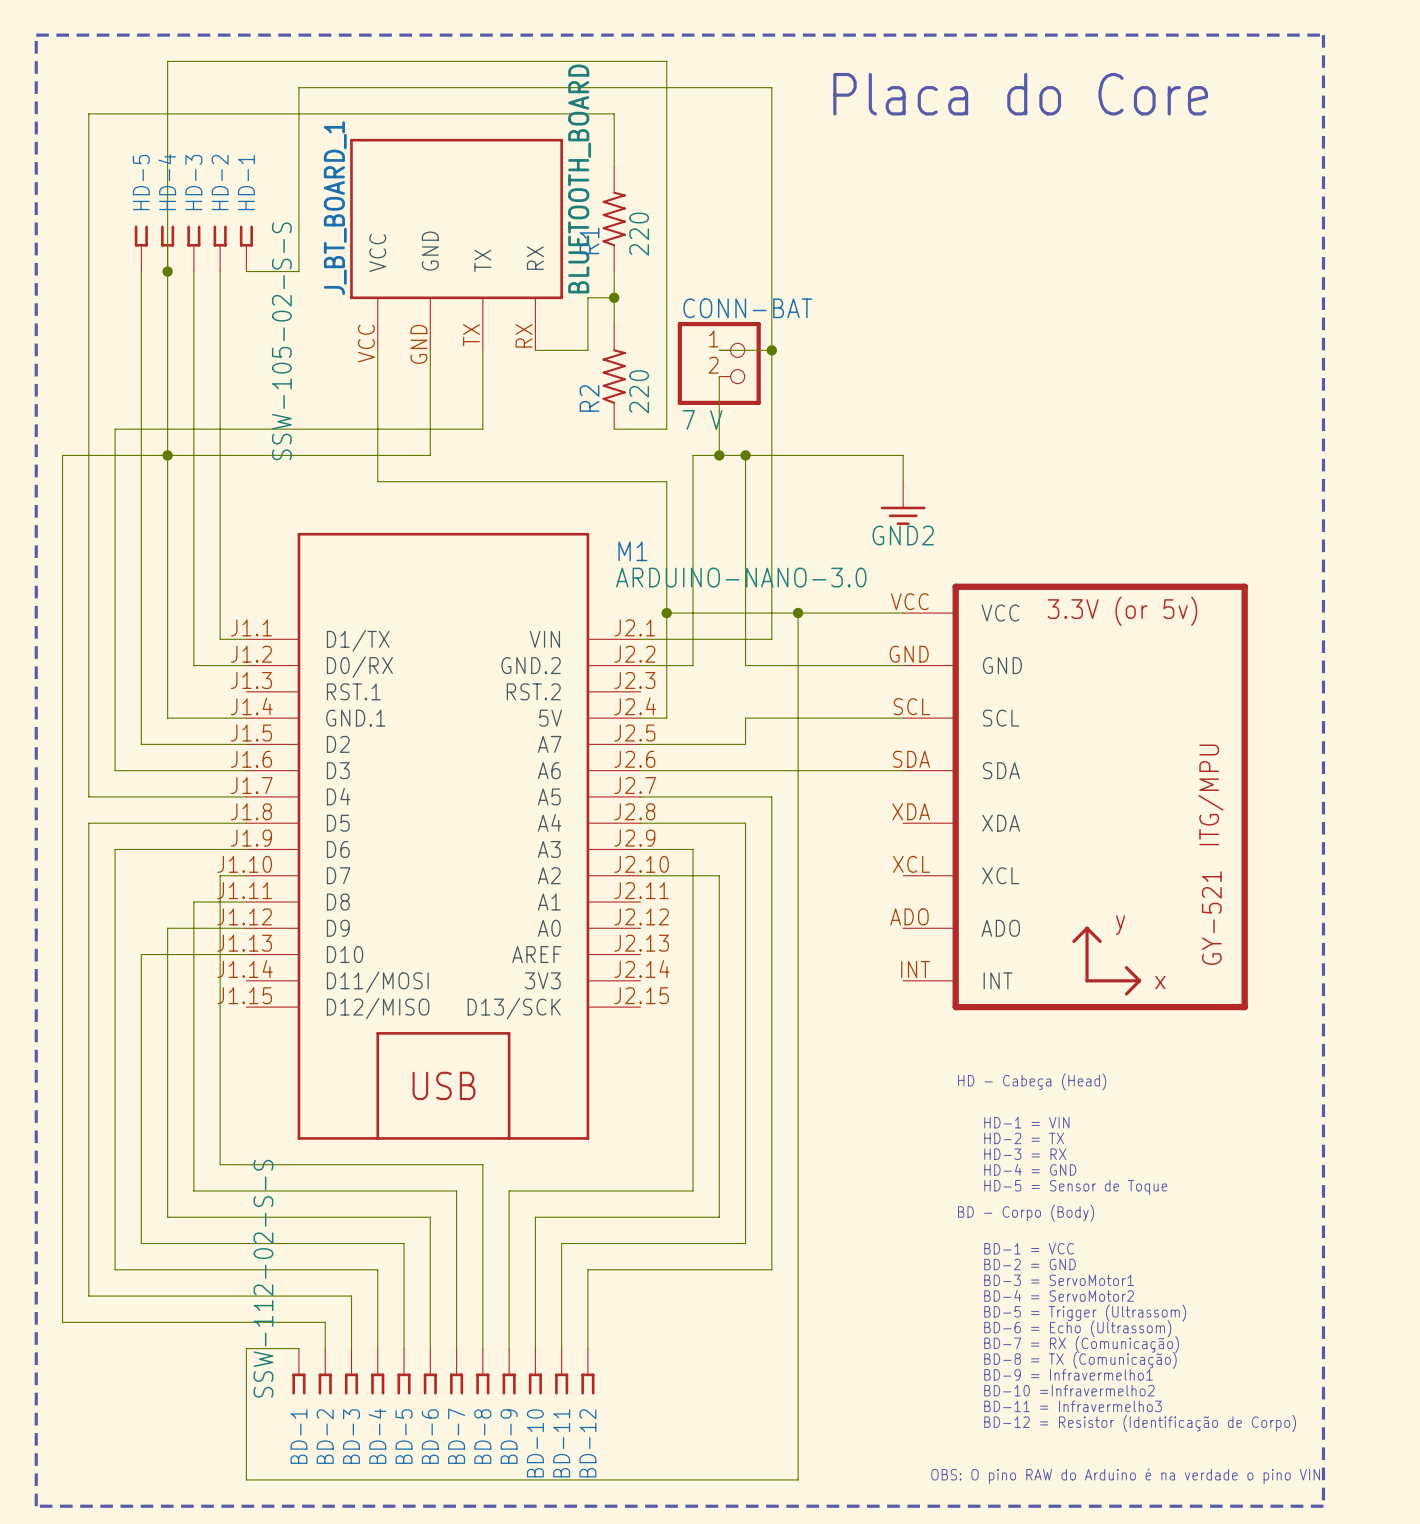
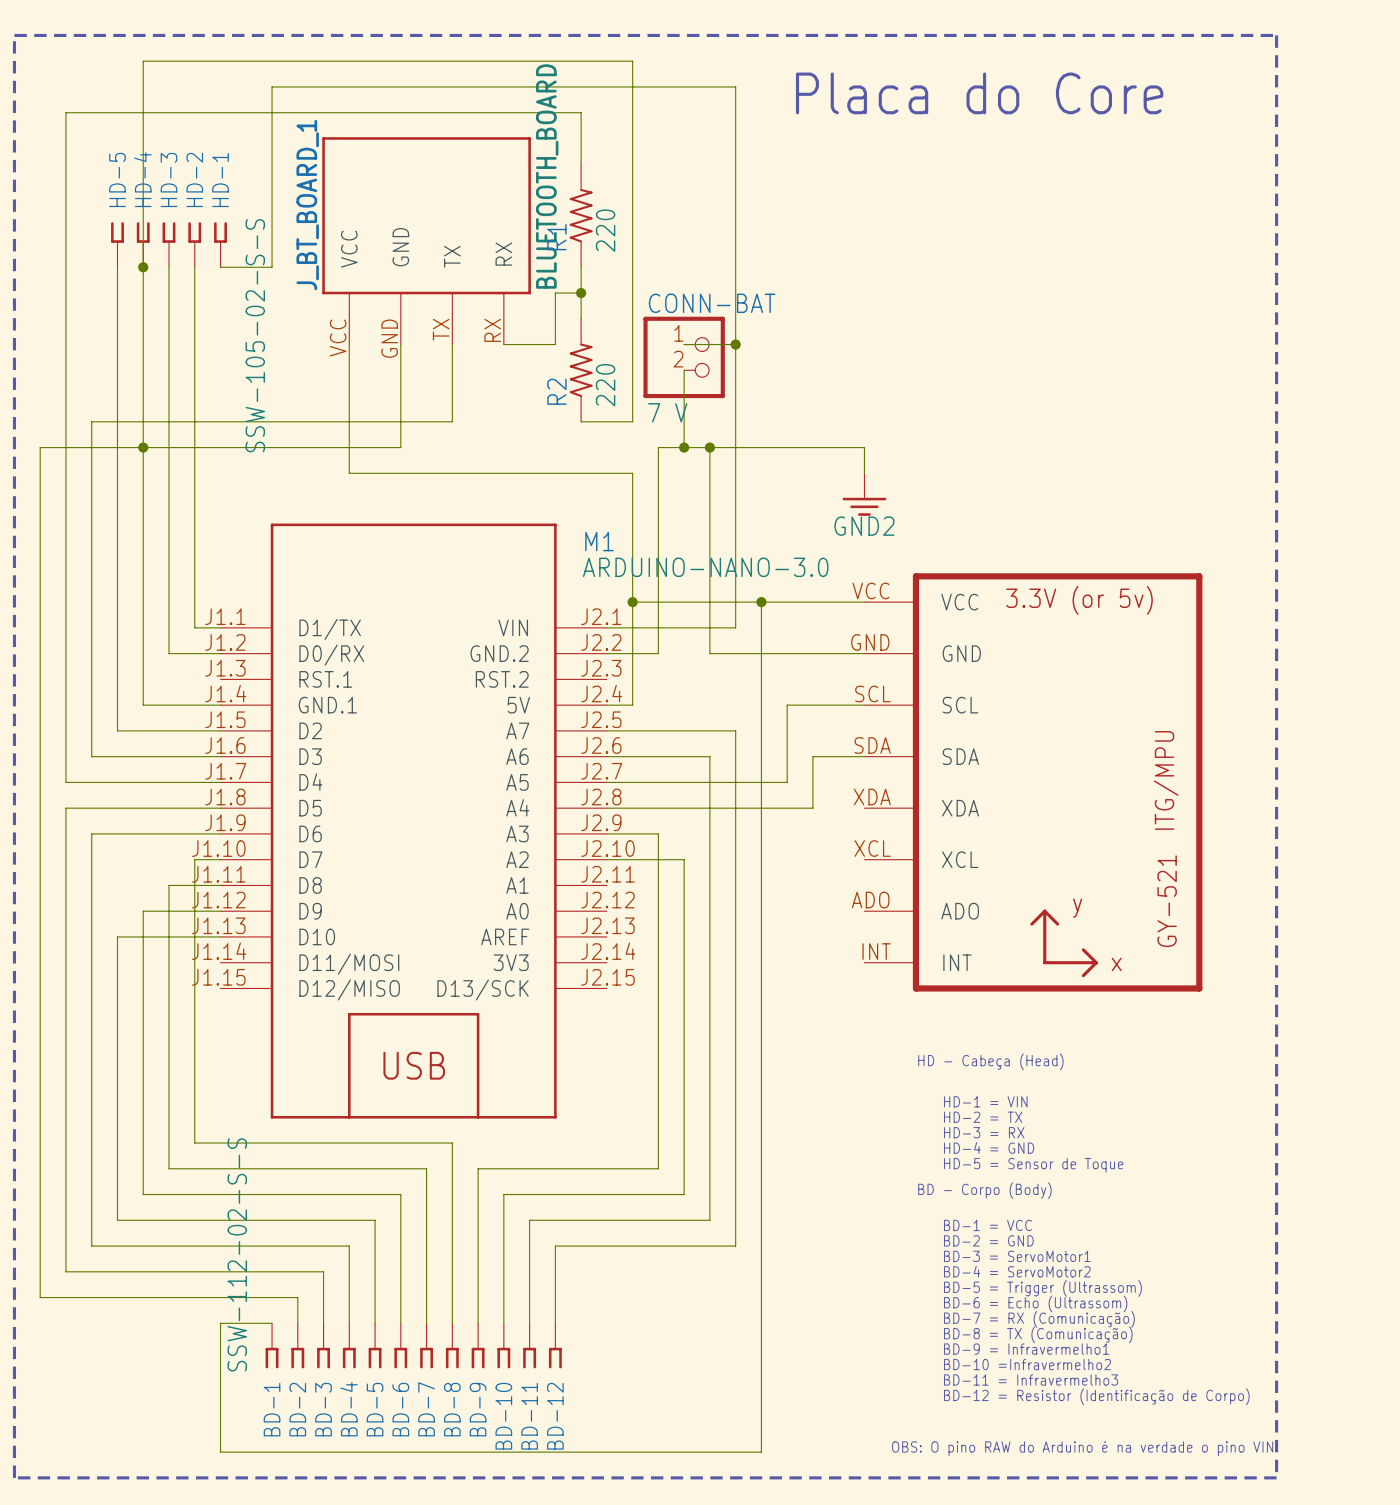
wire: (824, 718) (745, 718) (745, 744) -> (787, 705) (787, 782) (735, 782) (735, 730) (709, 730)
wire: (745, 770) (850, 770) -> (709, 756) (709, 808) (812, 808) (812, 756)

